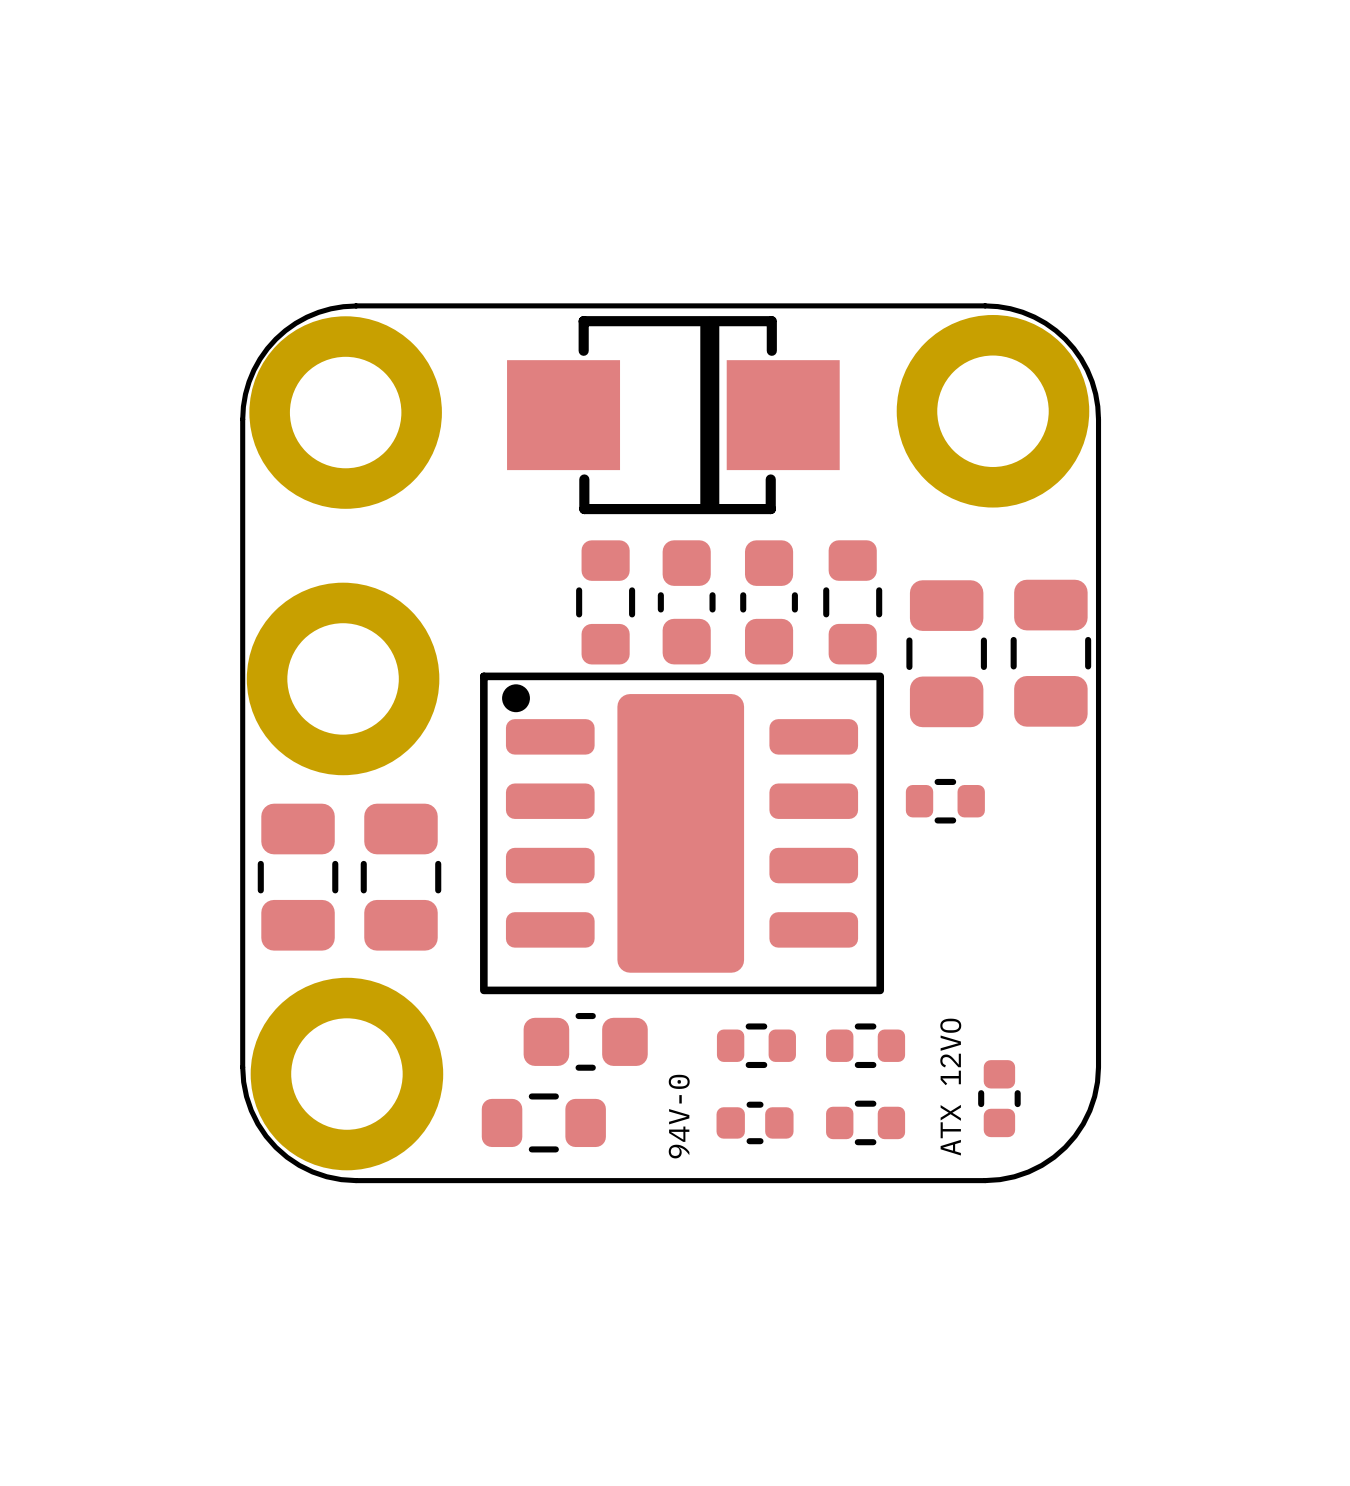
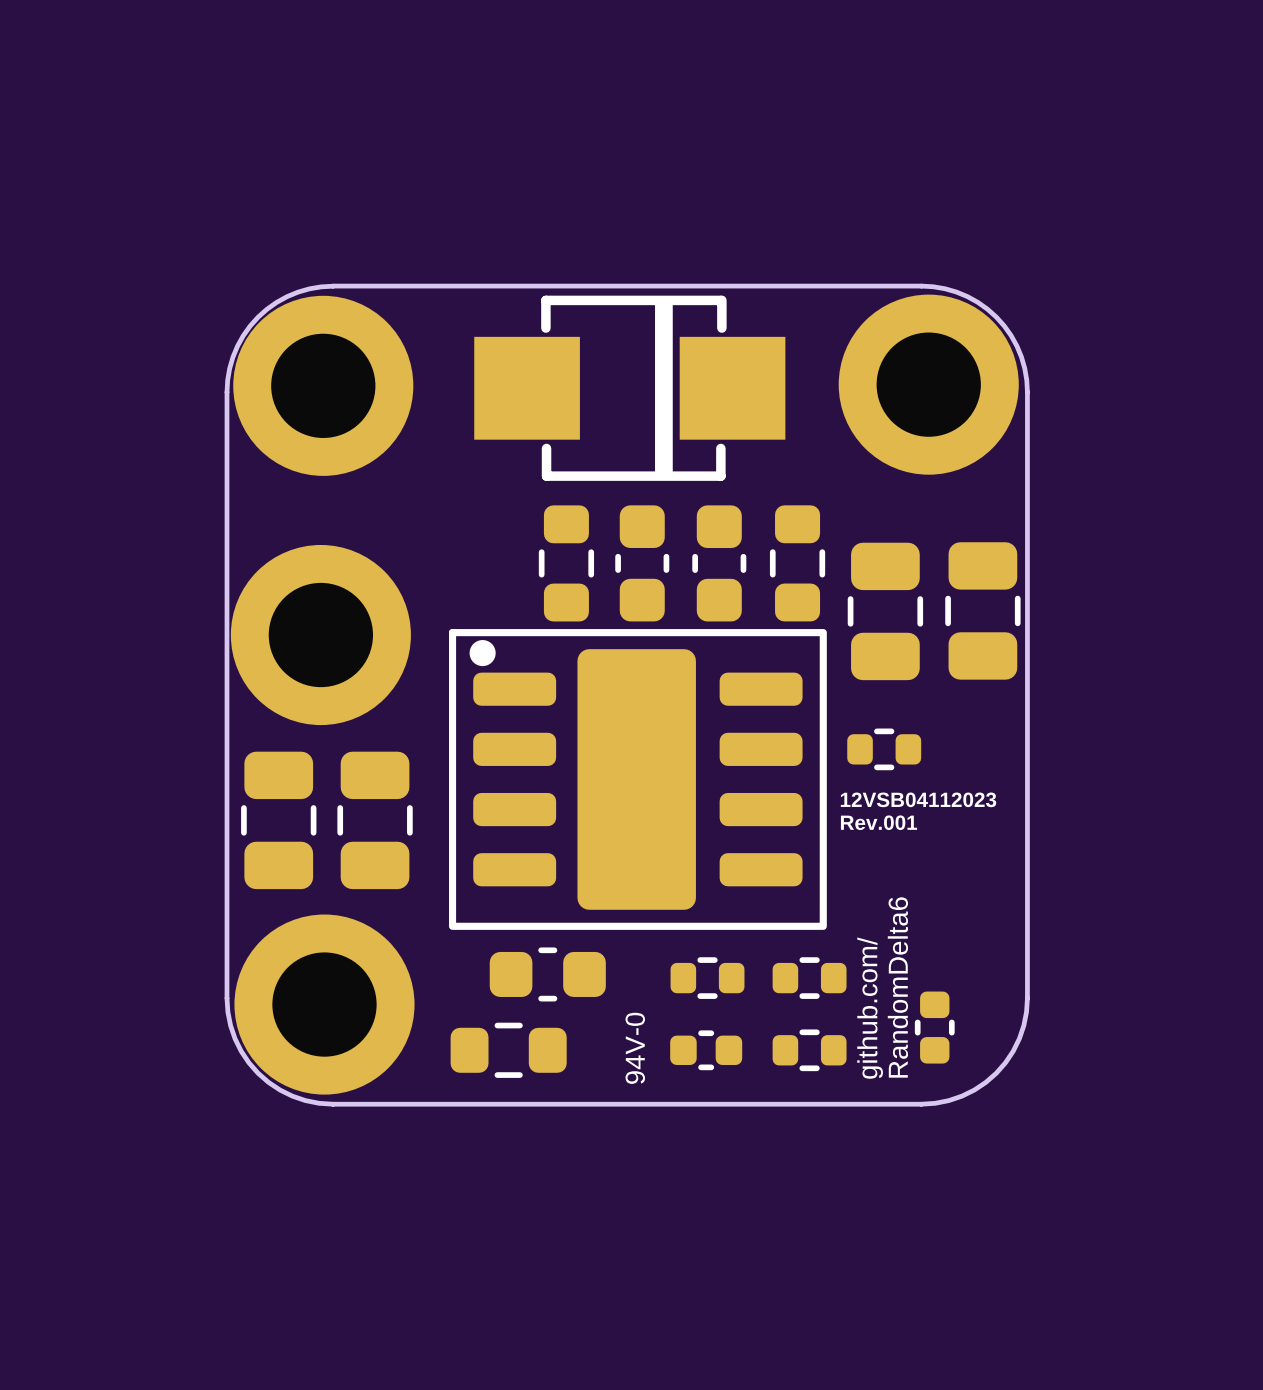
text: none -> 12VSB04112023 (918, 799)
text: none -> Rev.001 (879, 822)
text: none -> github.com/ (870, 1008)
text: ATX 12VO (950, 1087) -> RandomDelta6 (897, 987)

